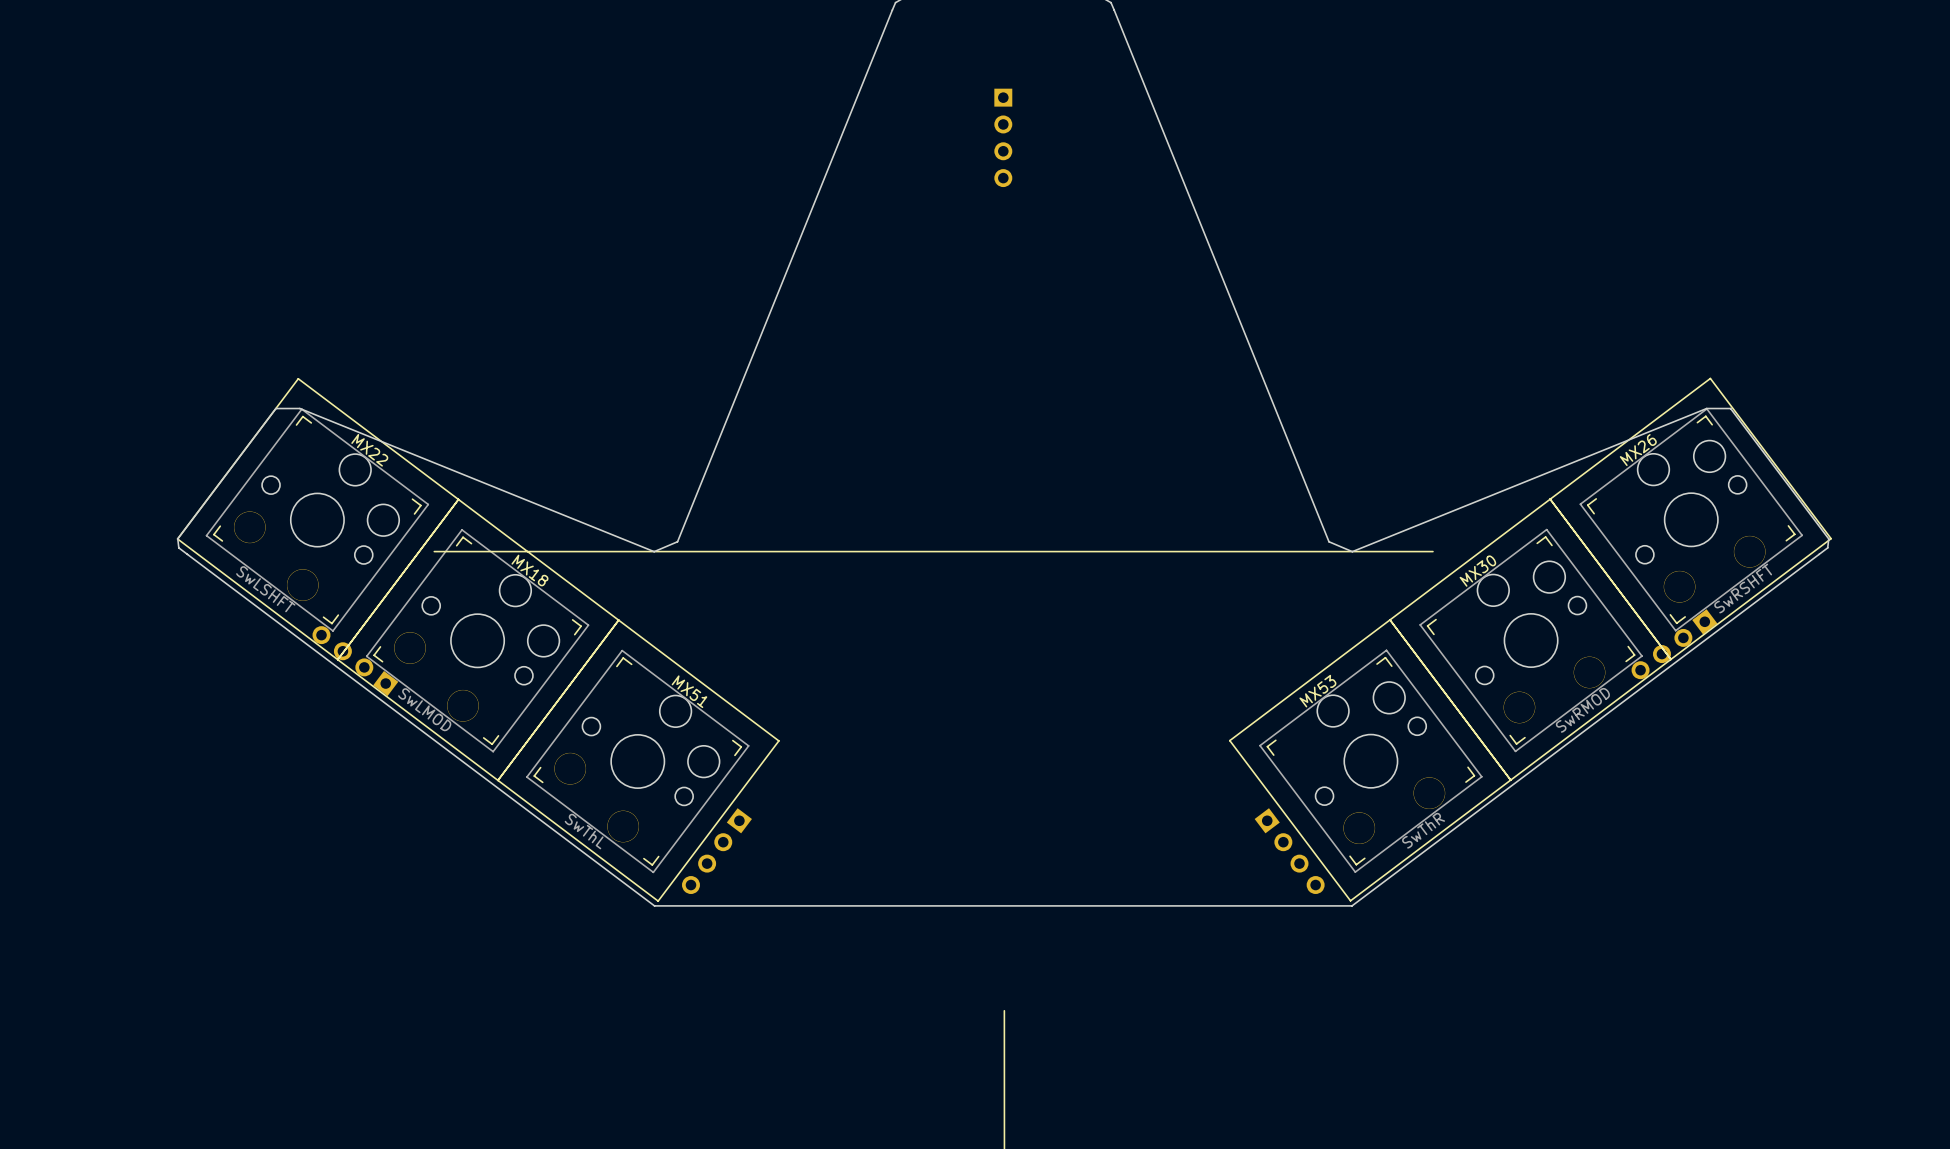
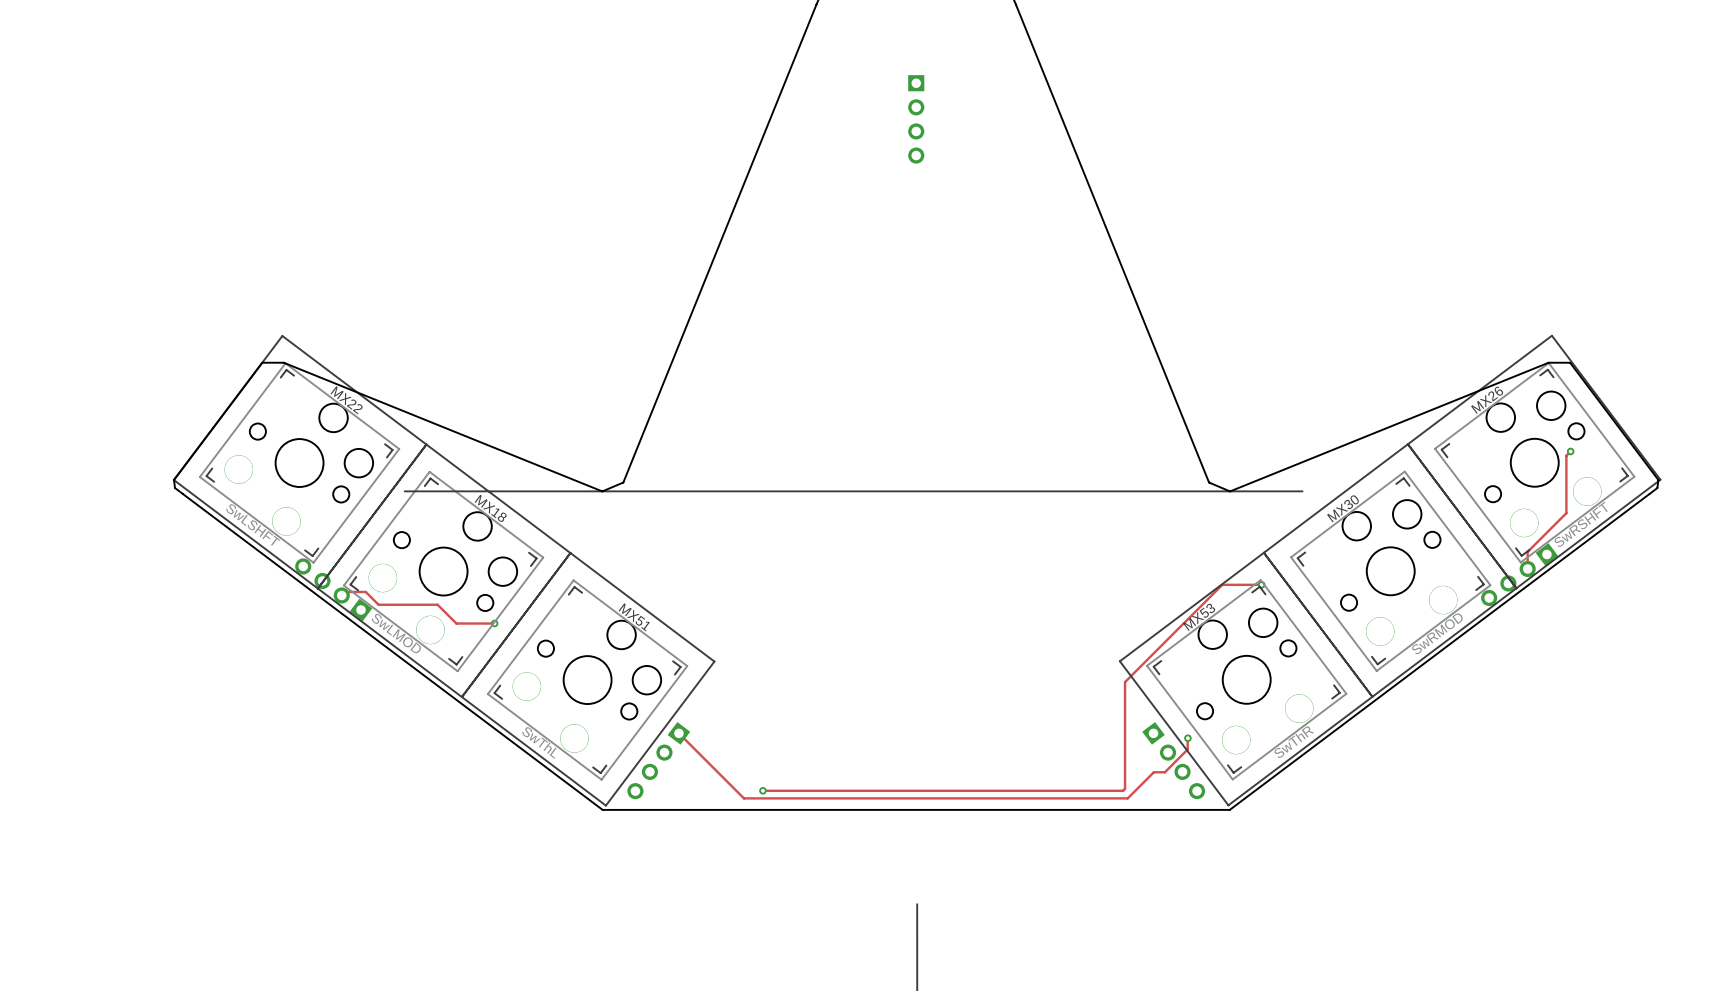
track: none -> (1570, 451) (1566, 455) (1566, 513) (1527, 551) (1527, 568)
via: none -> (1570, 451)
track: none -> (1261, 584) (1222, 584) (1125, 682) (1125, 788) (1123, 790) (762, 790)
via: none -> (1261, 584)
track: none -> (341, 595) (345, 591) (365, 591) (378, 604) (437, 604) (456, 623) (494, 623)
via: none -> (494, 623)
track: none -> (678, 733) (743, 798) (1127, 798) (1153, 772) (1164, 772) (1187, 749) (1187, 738)
via: none -> (1187, 738)
via: none -> (762, 790)

